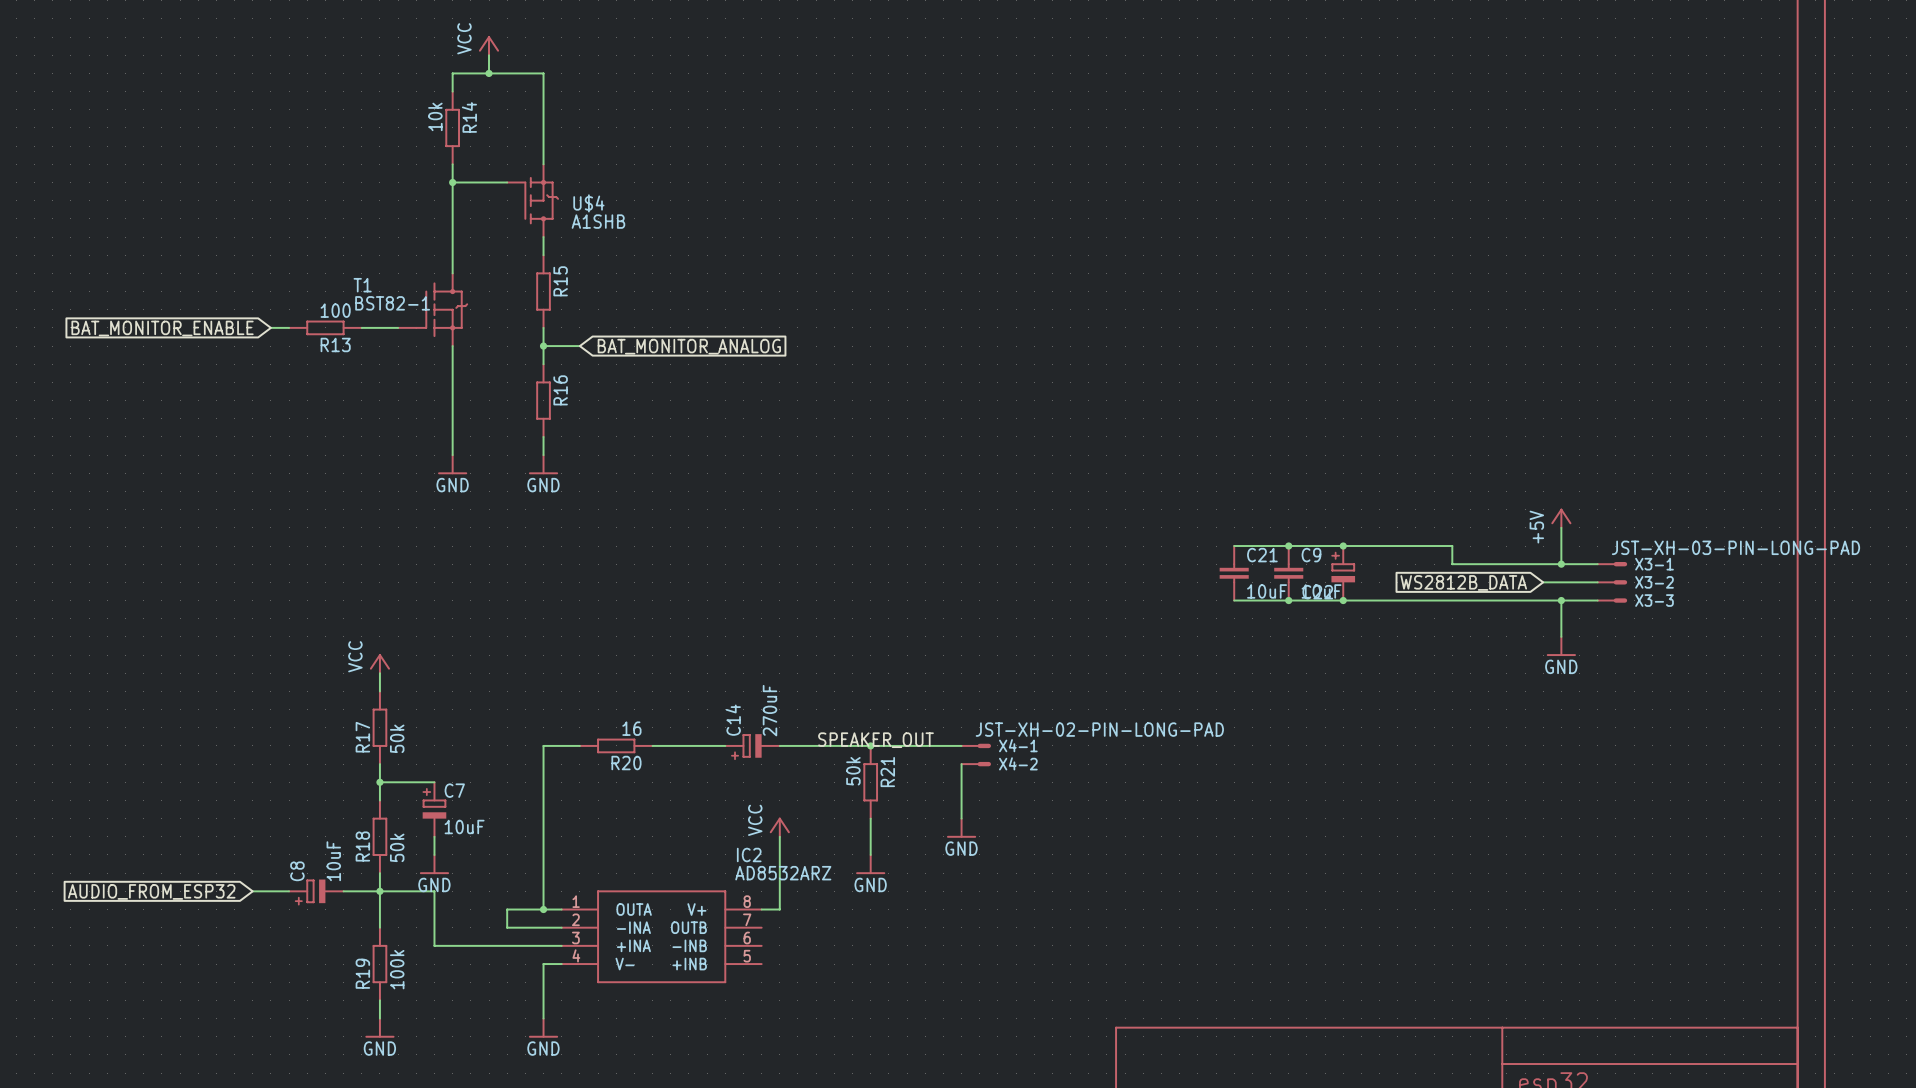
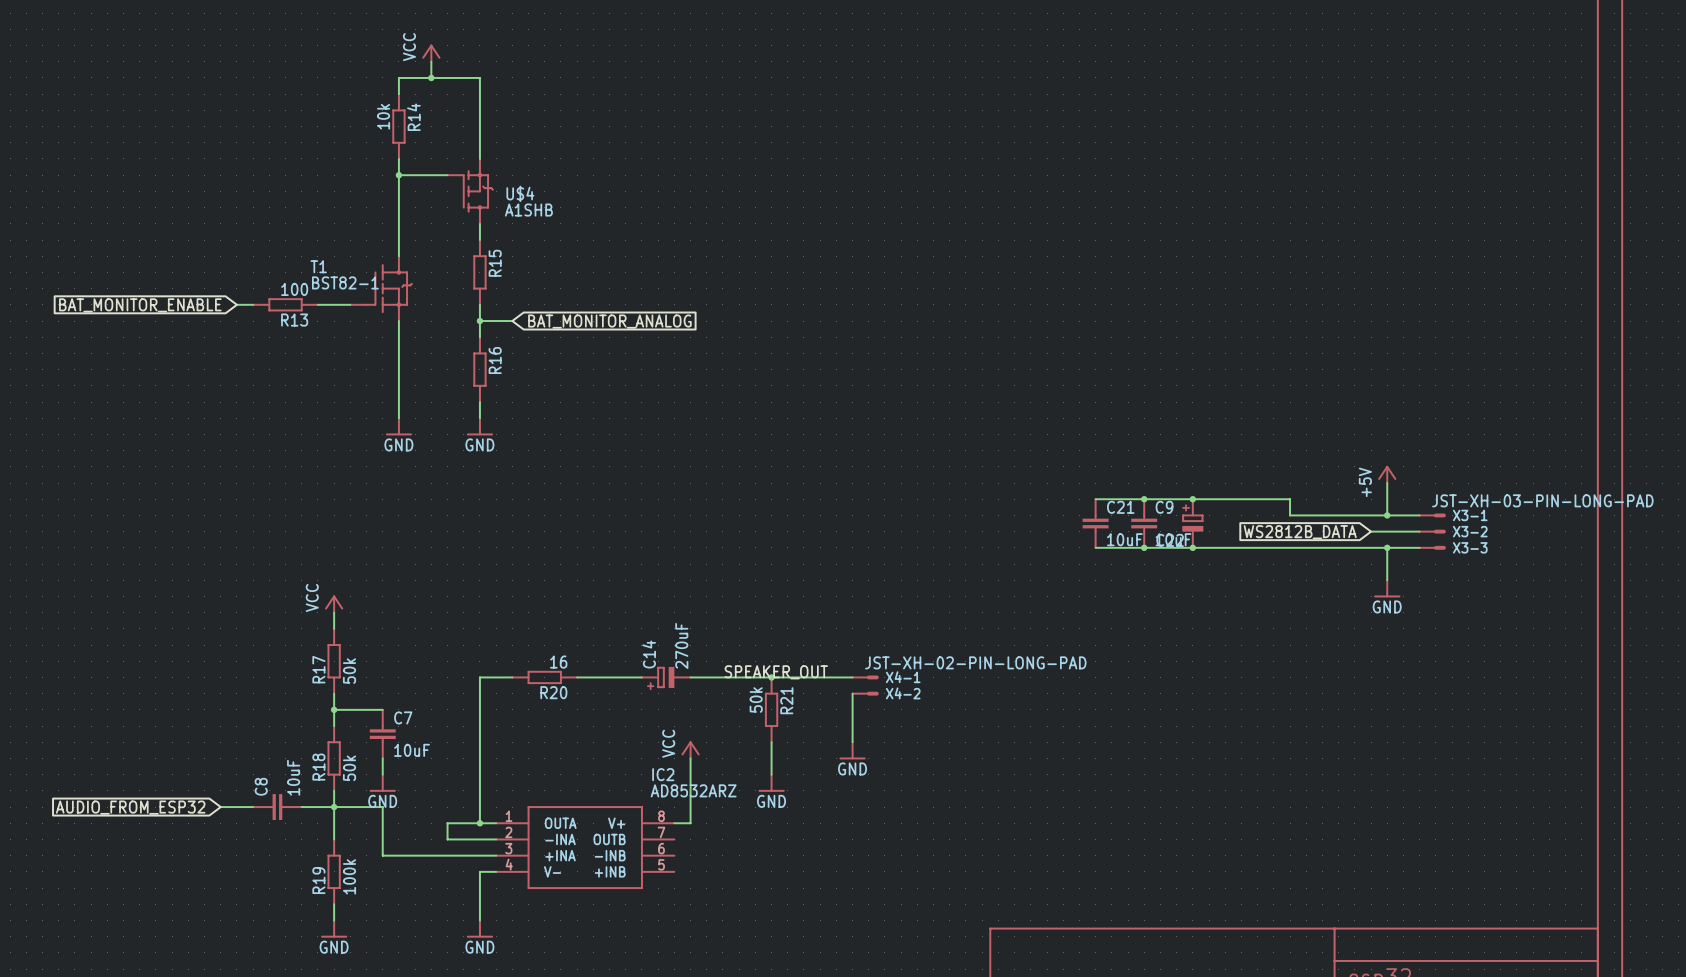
C7 symbol: [422, 782, 447, 837] -> [369, 709, 396, 759]
C8 symbol: [289, 879, 344, 904] -> [253, 794, 302, 821]

